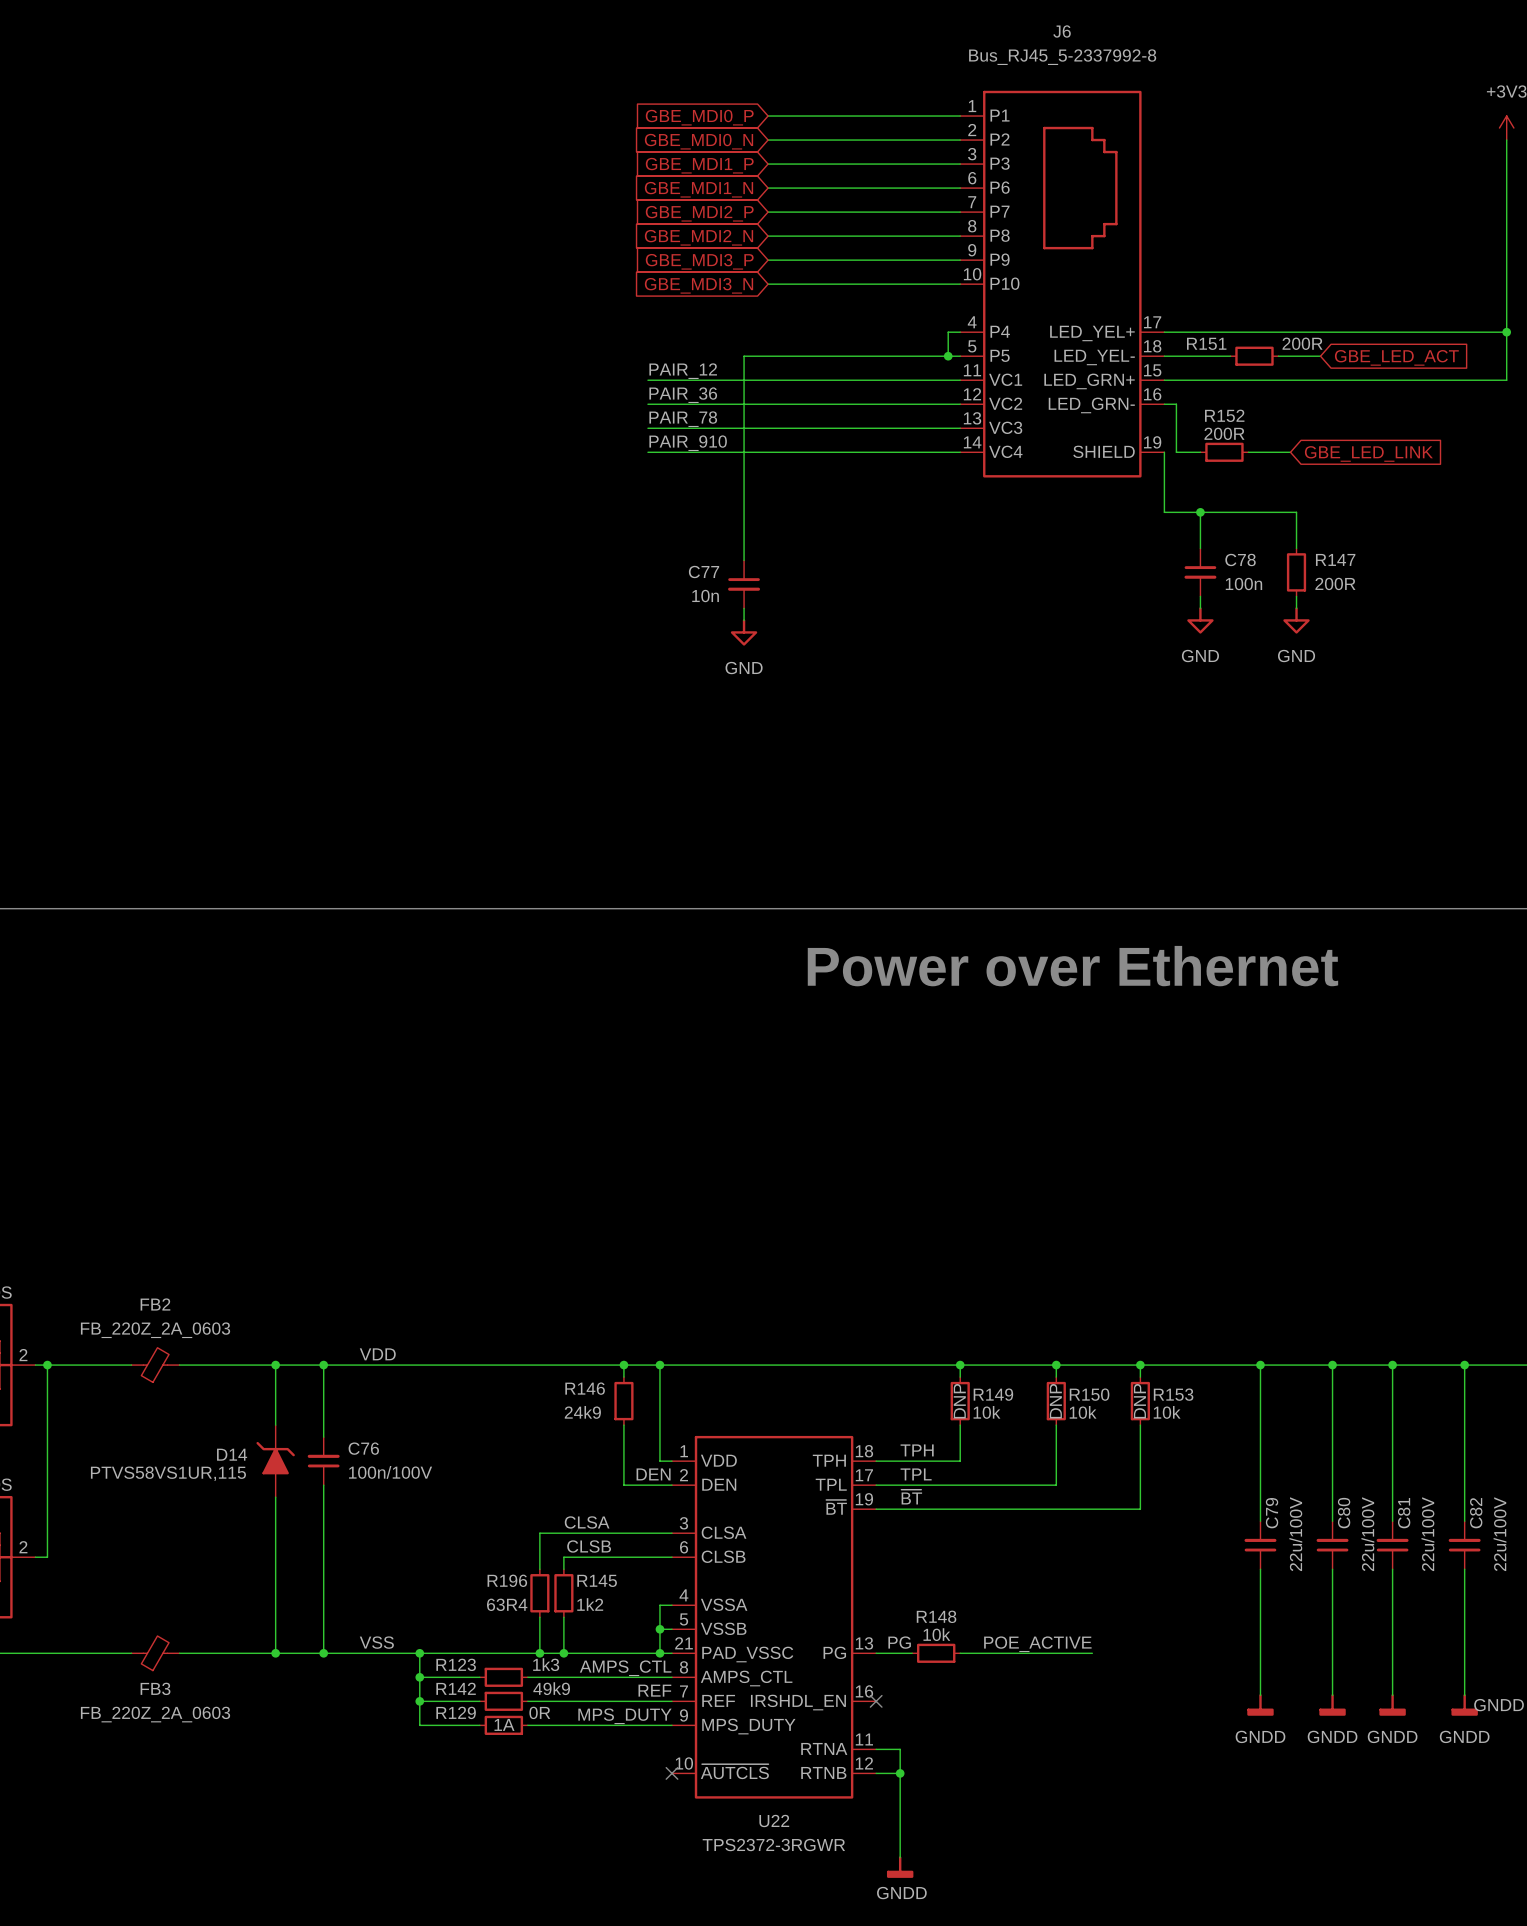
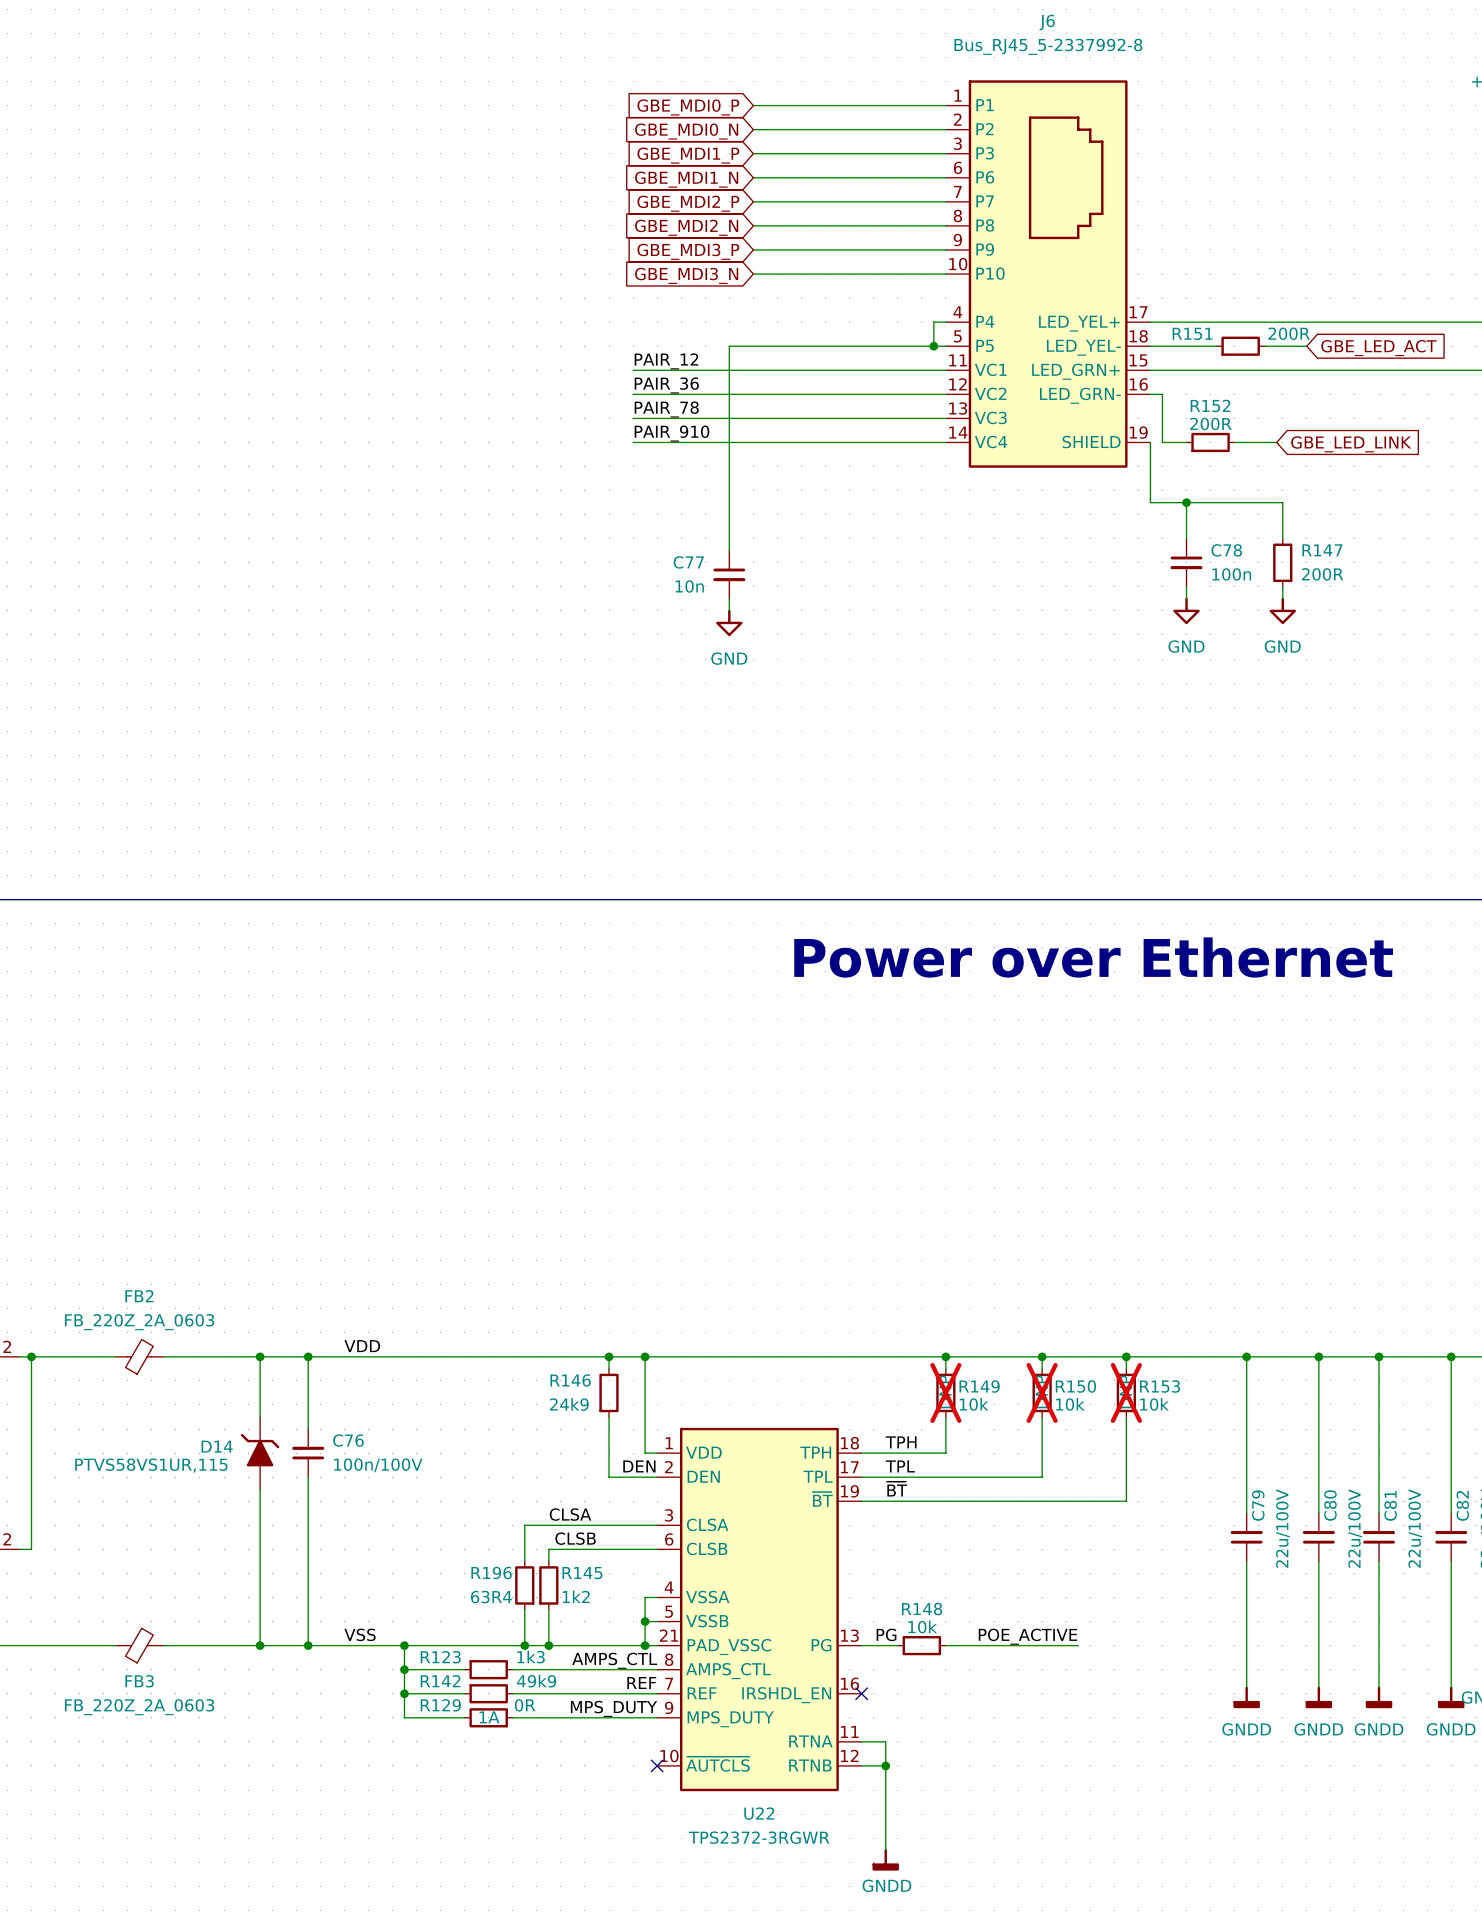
R149 do-not-place cross: none -> (945, 1392)
R150 do-not-place cross: none -> (1042, 1392)
R153 do-not-place cross: none -> (1126, 1392)

